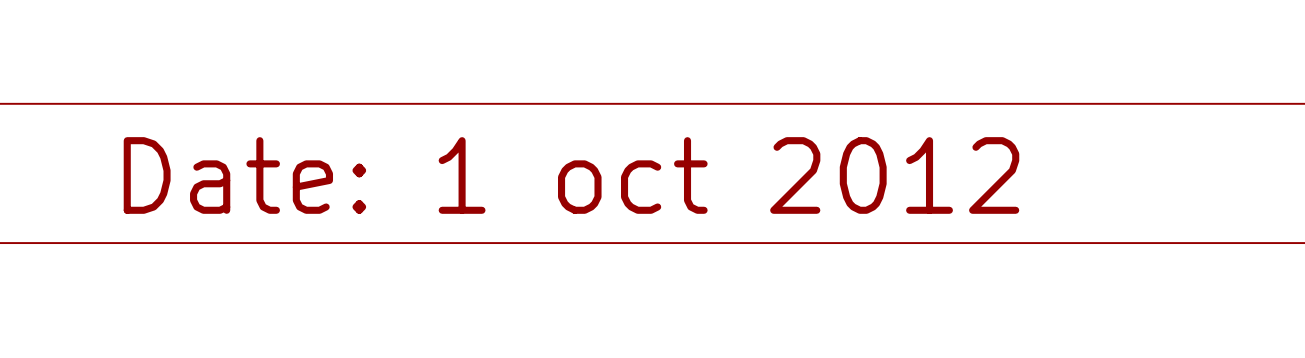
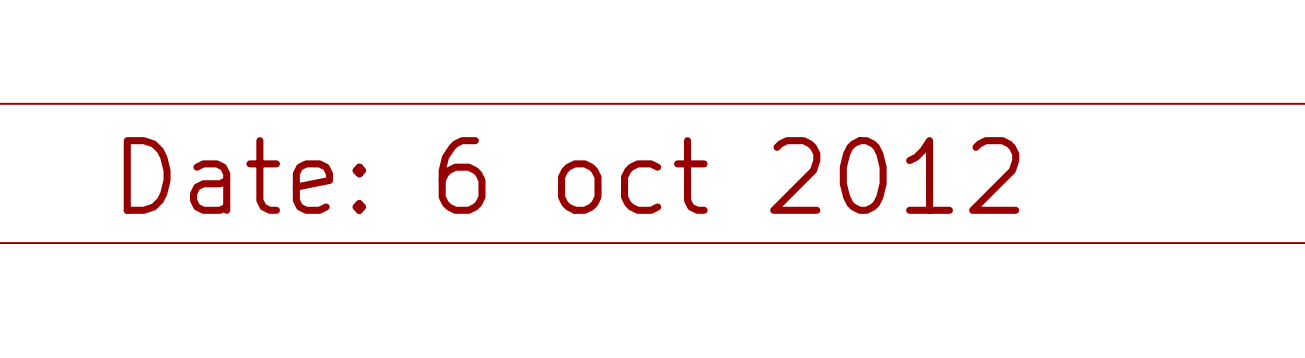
title block: Date: 1 oct 2012 (571, 175) -> Date: 6 oct 2012 (571, 175)

